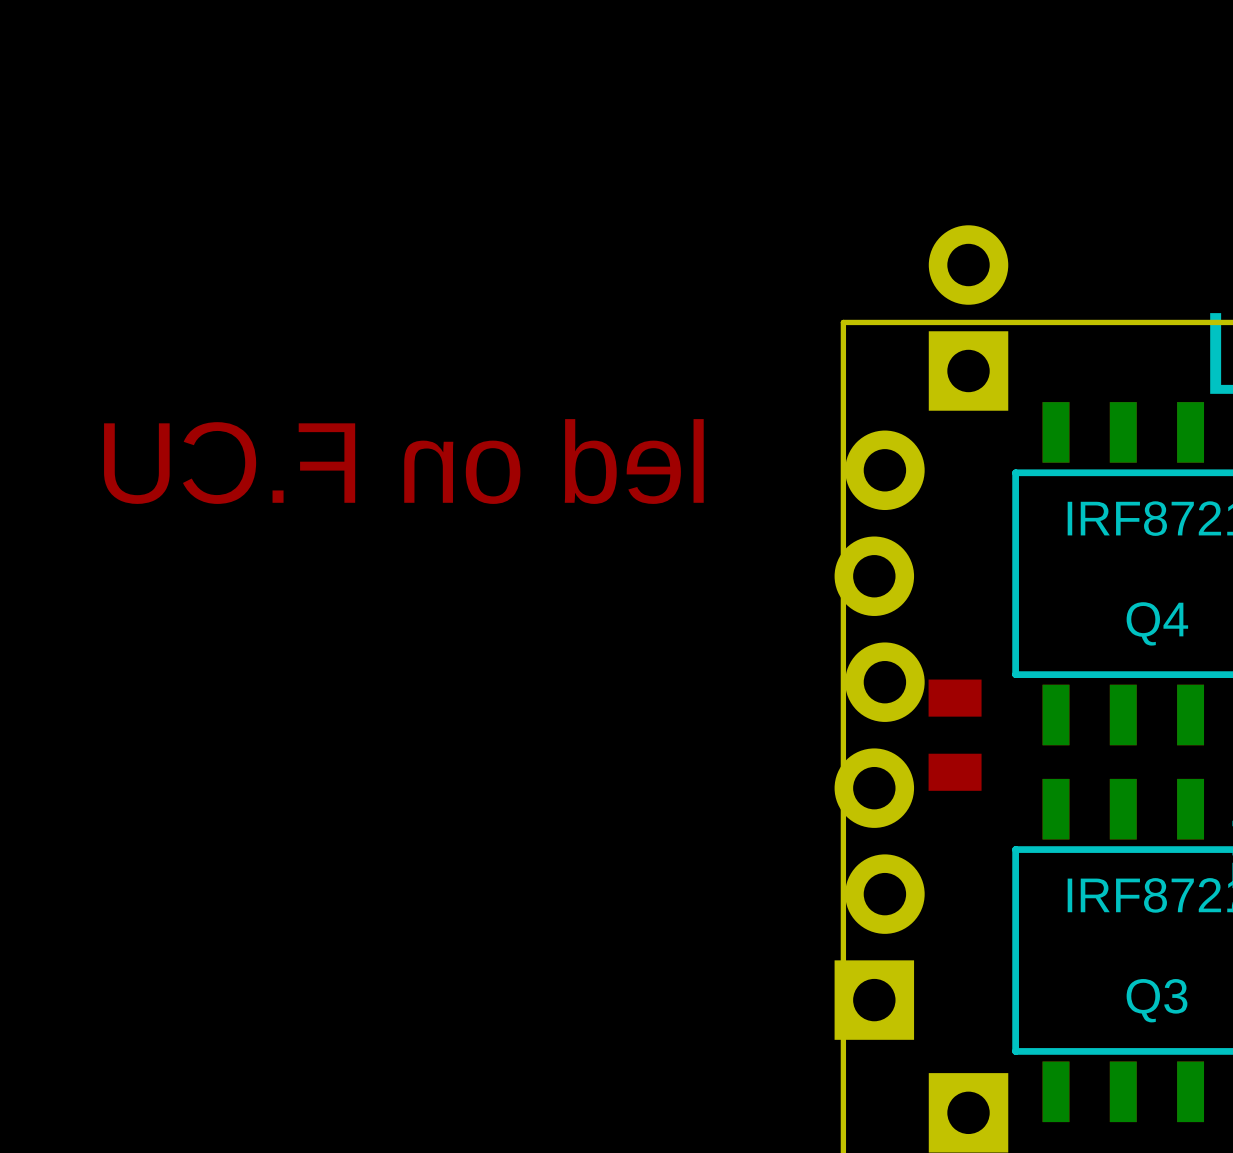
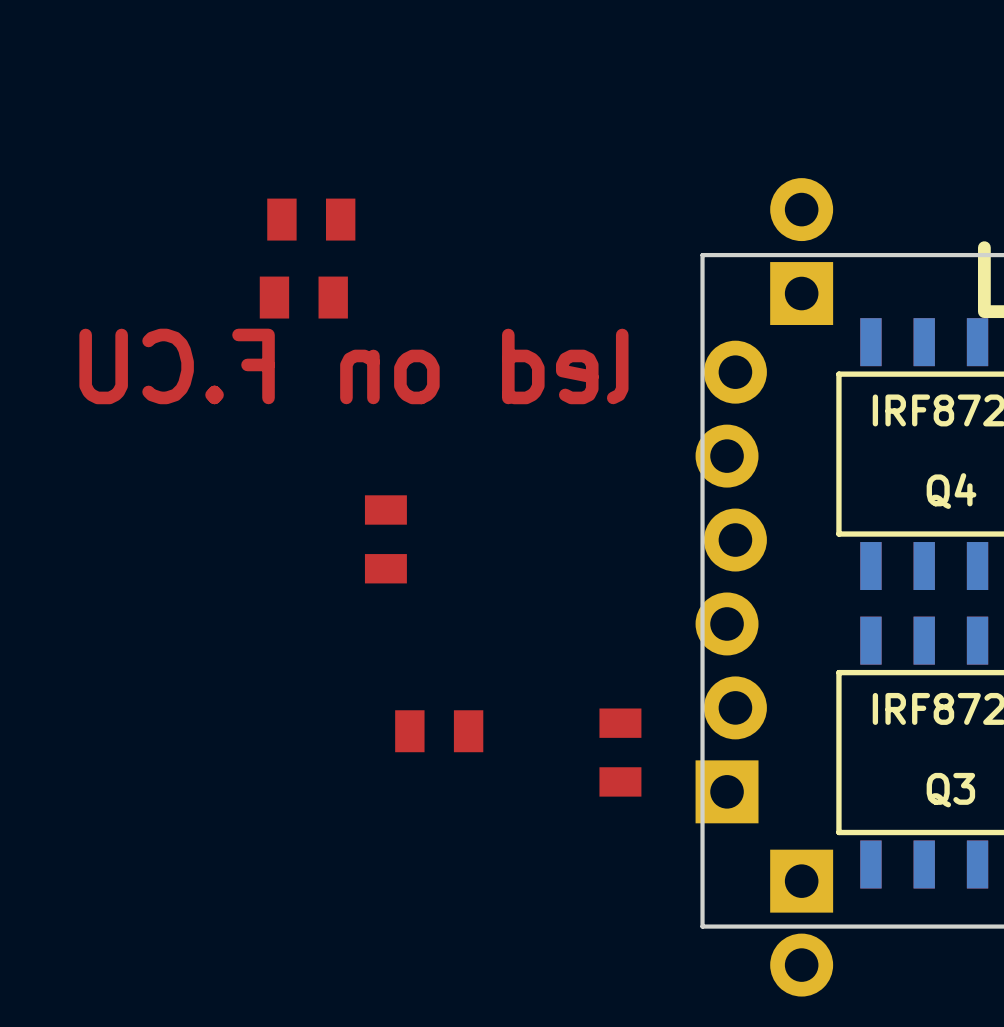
part: none -> (311, 219)
part: none -> (303, 297)
part: none -> (385, 539)
part: (955, 735) -> none
part: none -> (439, 731)
part: none -> (620, 752)

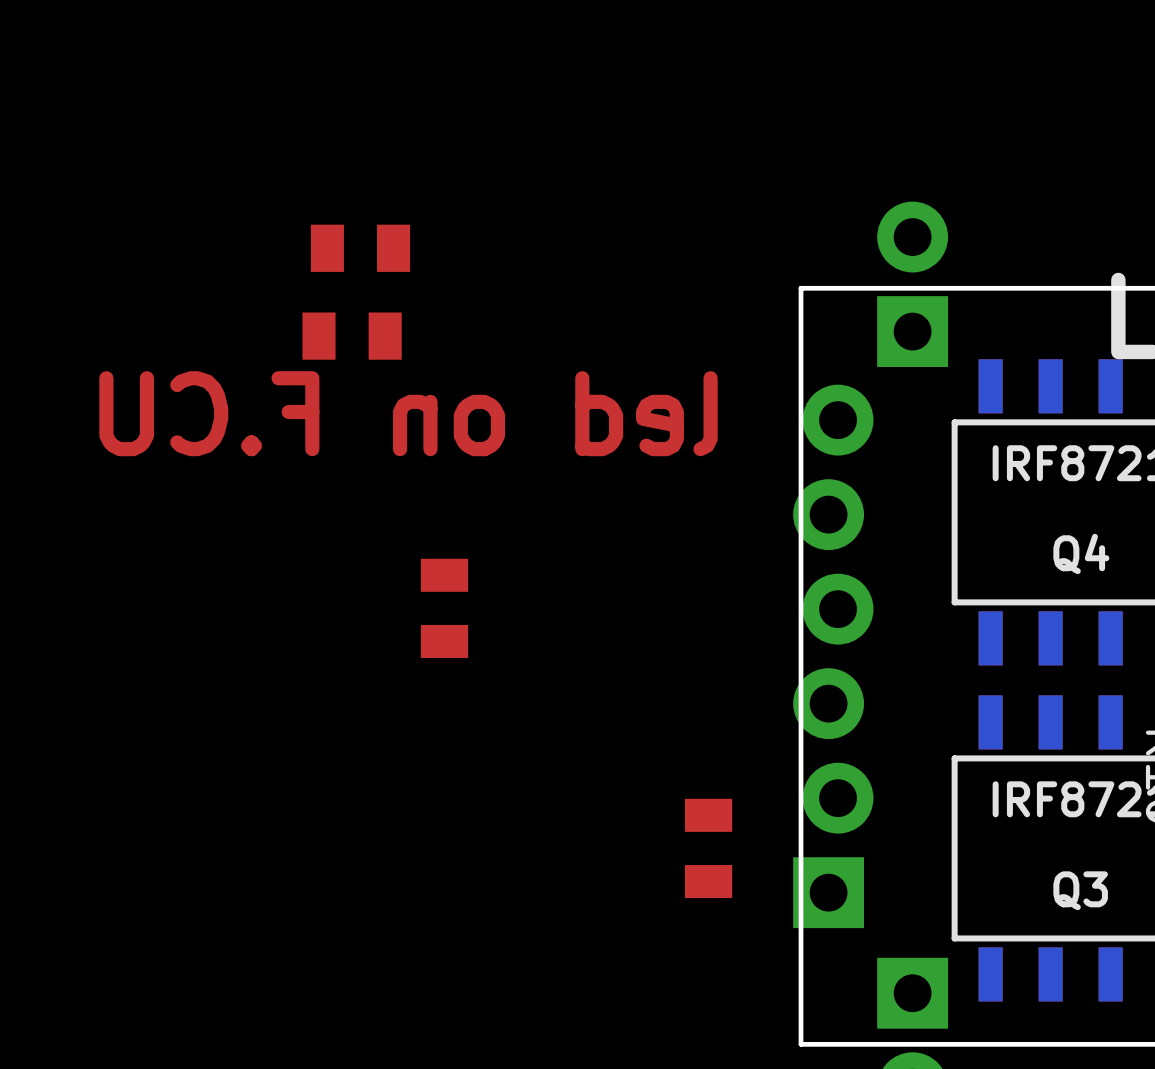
part: (439, 731) -> none

